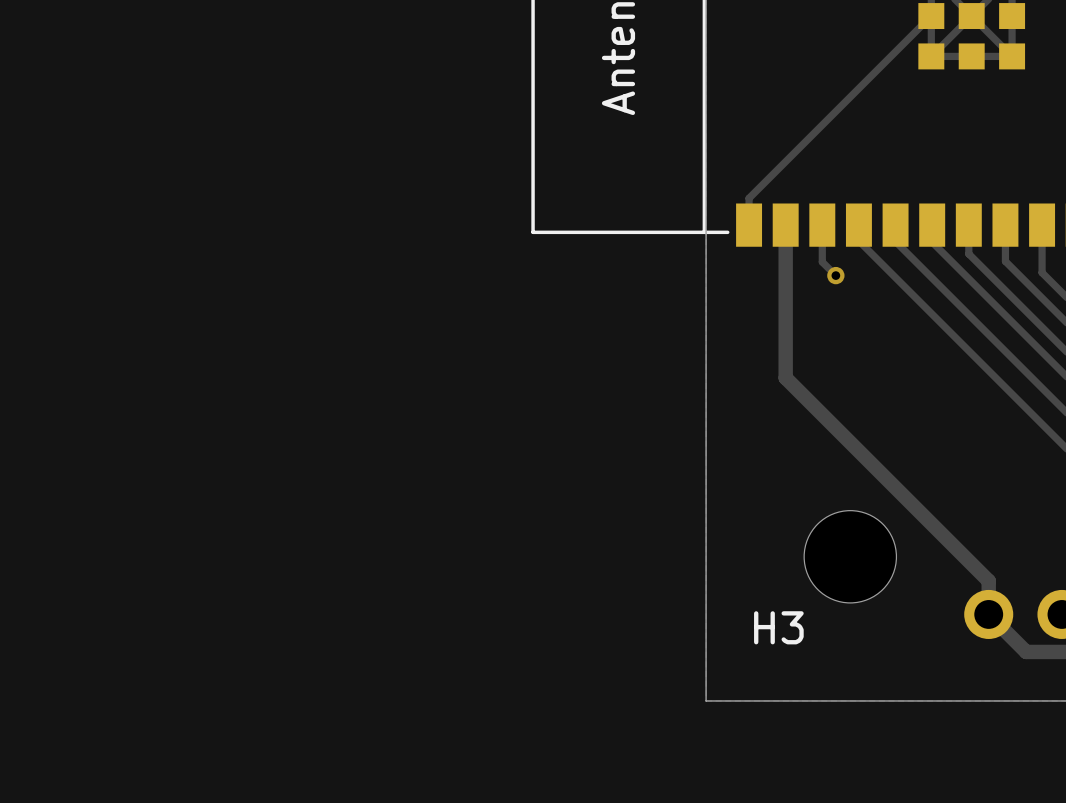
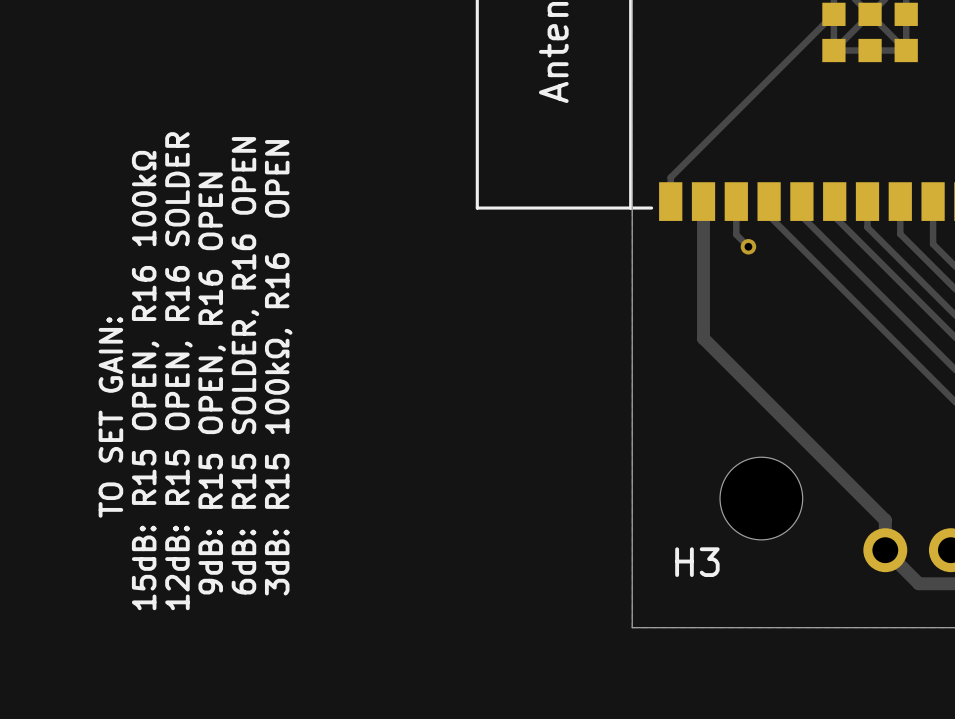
text: none -> 6dB: R15 SOLDER, R16 OPEN (245, 365)
text: none -> 3dB: R15 100kΩ, R16 OPEN (278, 367)
text: none -> 12dB: R15 OPEN, R16 SOLDER (178, 371)
text: none -> 15dB: R15 OPEN, R16 100kΩ (145, 380)
text: none -> 9dB: R15 OPEN, R16 OPEN (212, 383)
text: none -> TO SET GAIN: (110, 417)

